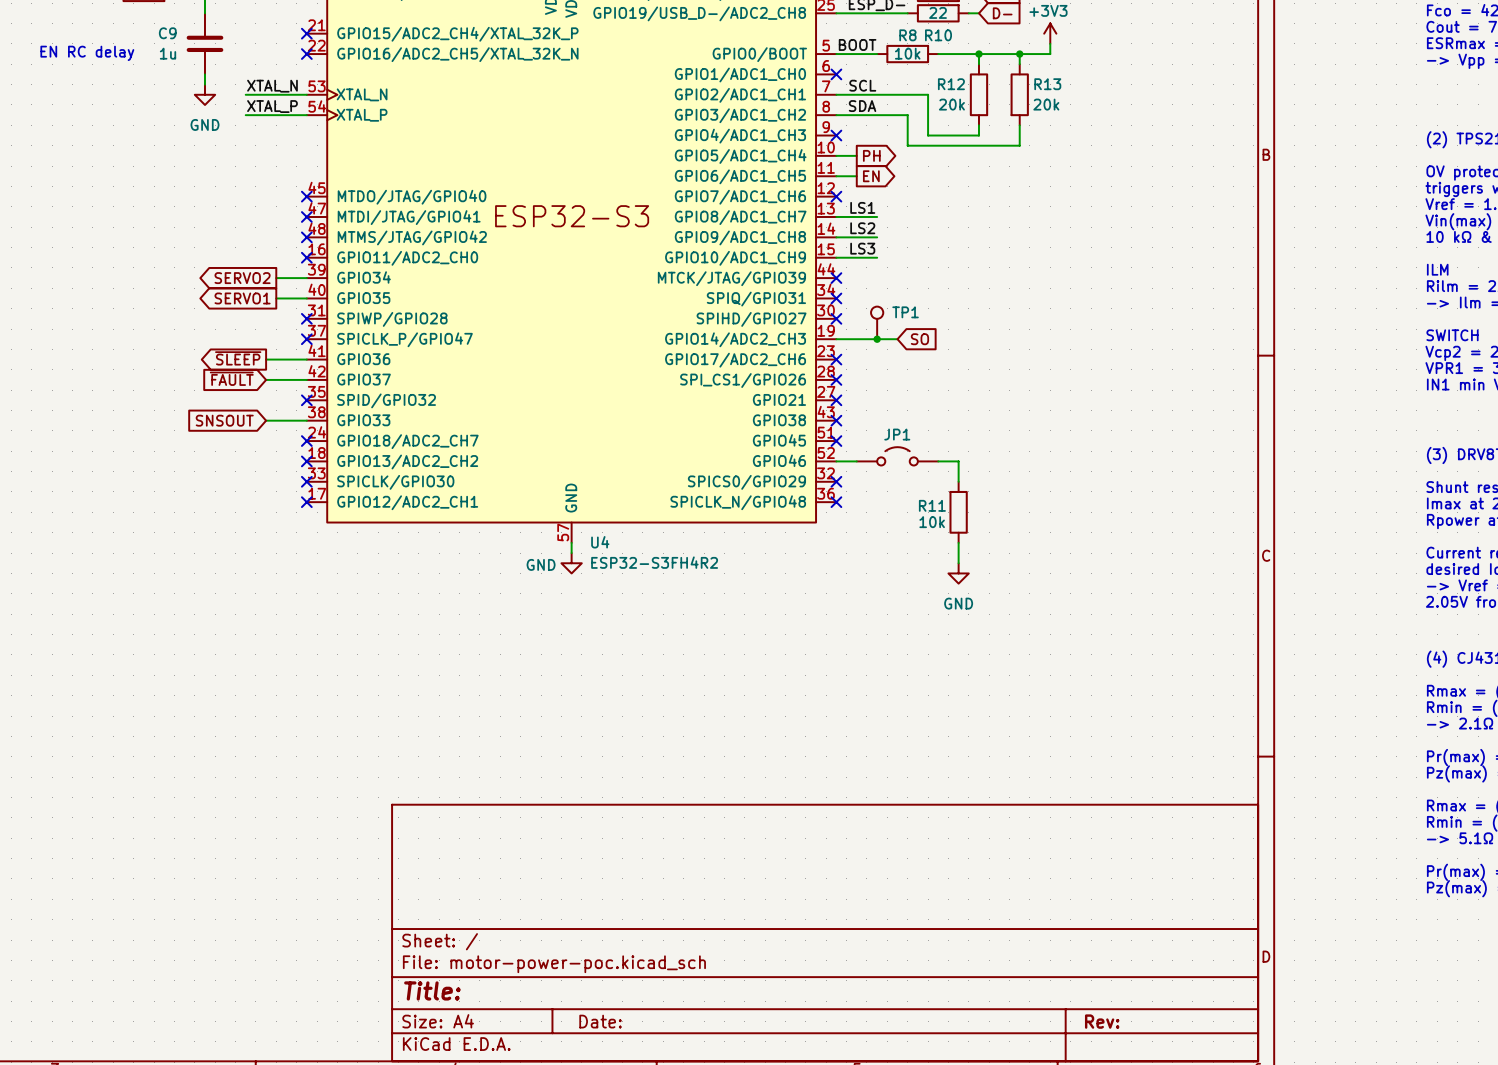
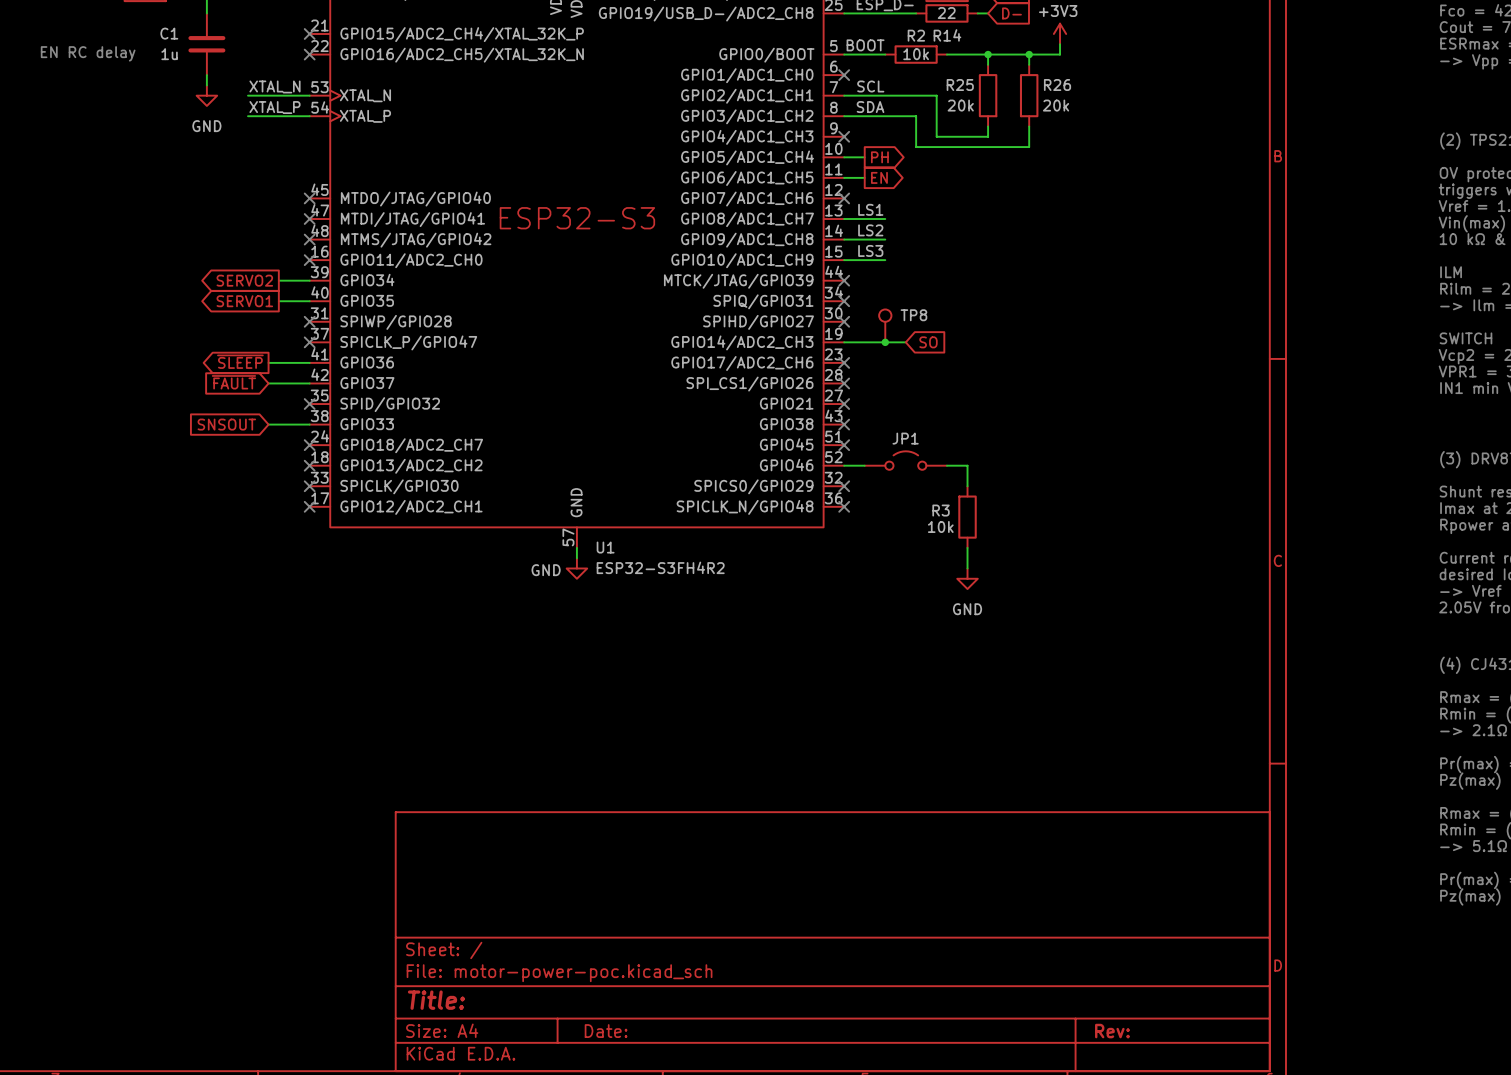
C9 name: C9 (167, 33) -> C1 (169, 33)
R8 name: R8 (907, 35) -> R2 (916, 35)
R10 name: R10 (938, 35) -> R14 (947, 35)
R12 name: R12 (951, 84) -> R25 (960, 85)
R13 name: R13 (1047, 84) -> R26 (1057, 85)
TP1 name: TP1 (905, 312) -> TP8 (913, 315)
R11 name: R11 (932, 505) -> R3 (941, 510)
U4 name: U4 (600, 542) -> U1 (605, 547)

